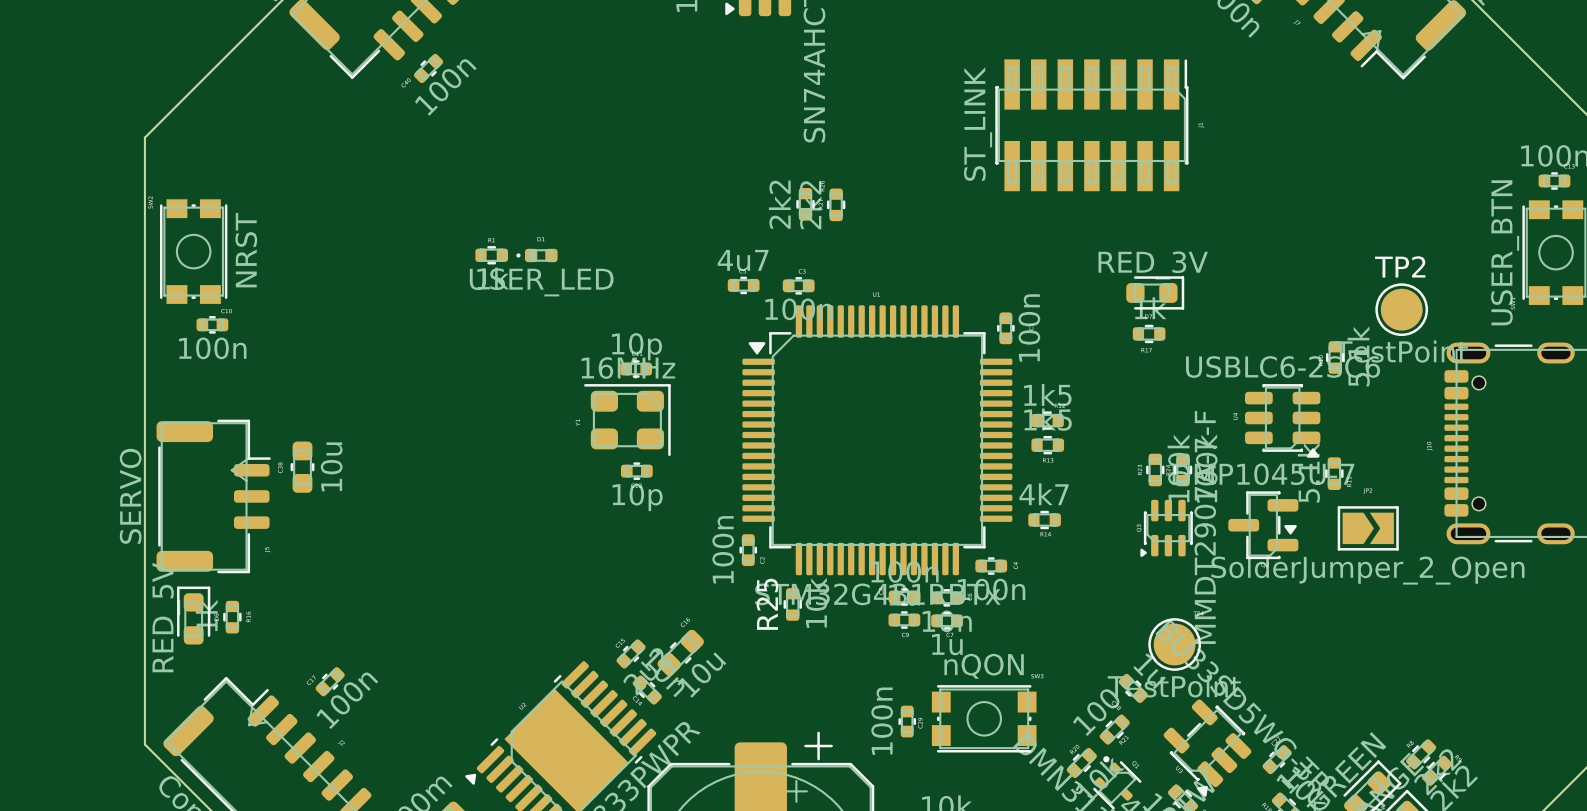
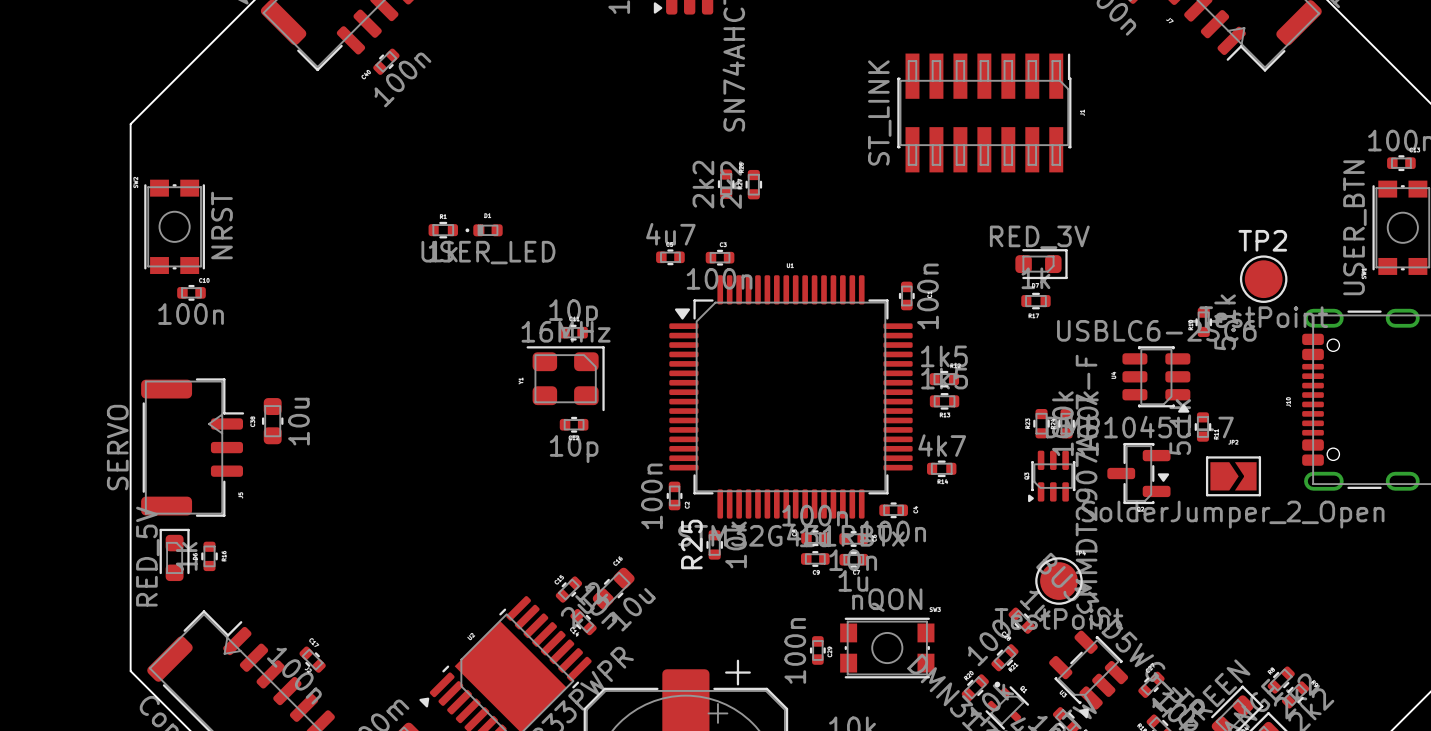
part rotation: 0° (330, 681) -> 90° clockwise (312, 659)
part position: (330, 681) -> (312, 659)

